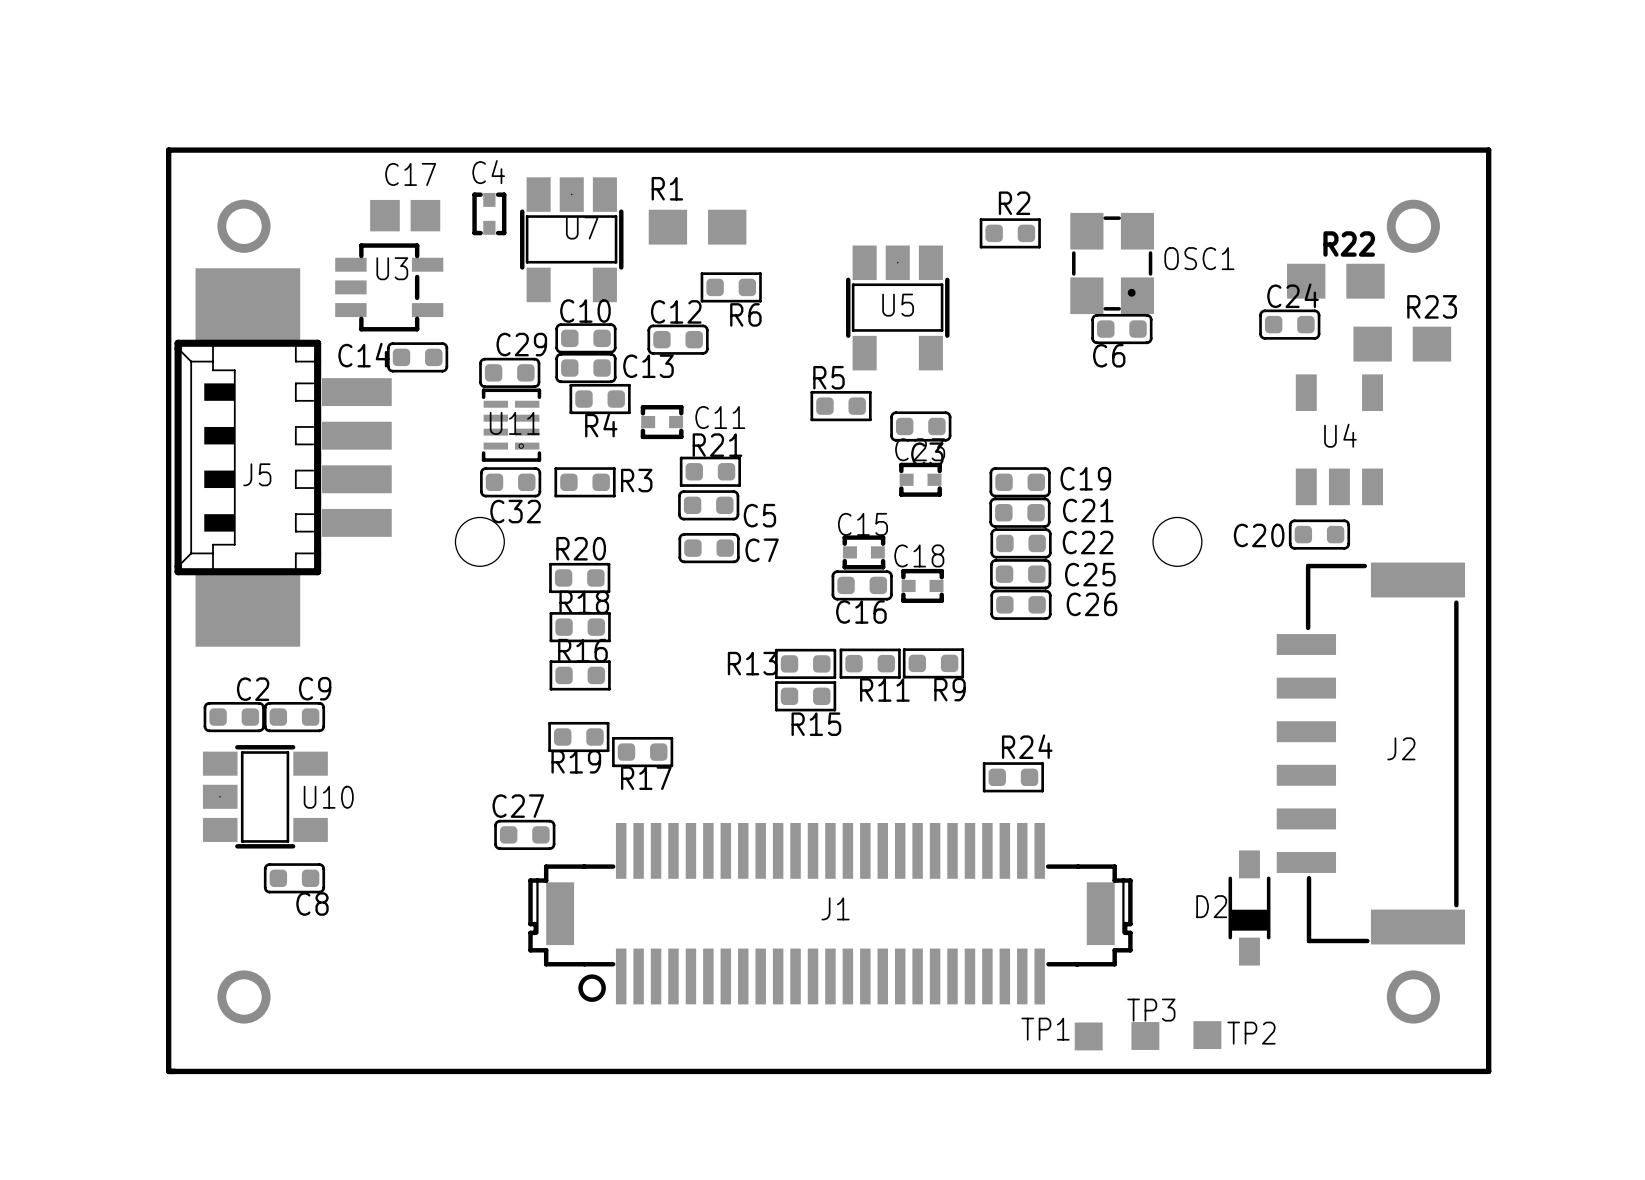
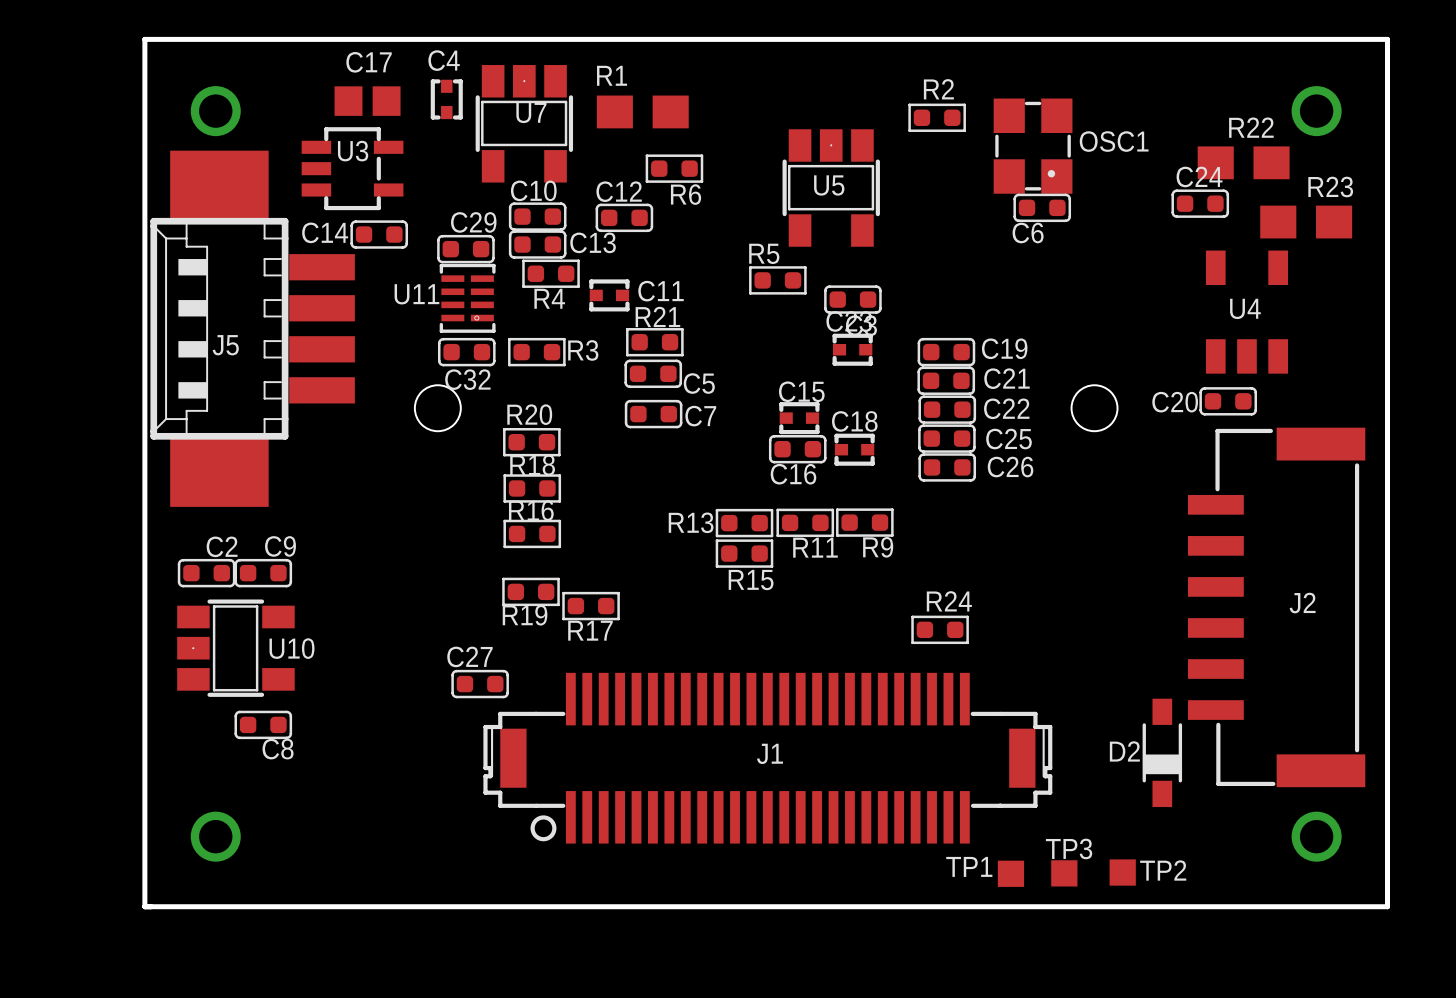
U11 name position: U11 (514, 423) -> U11 (416, 294)

